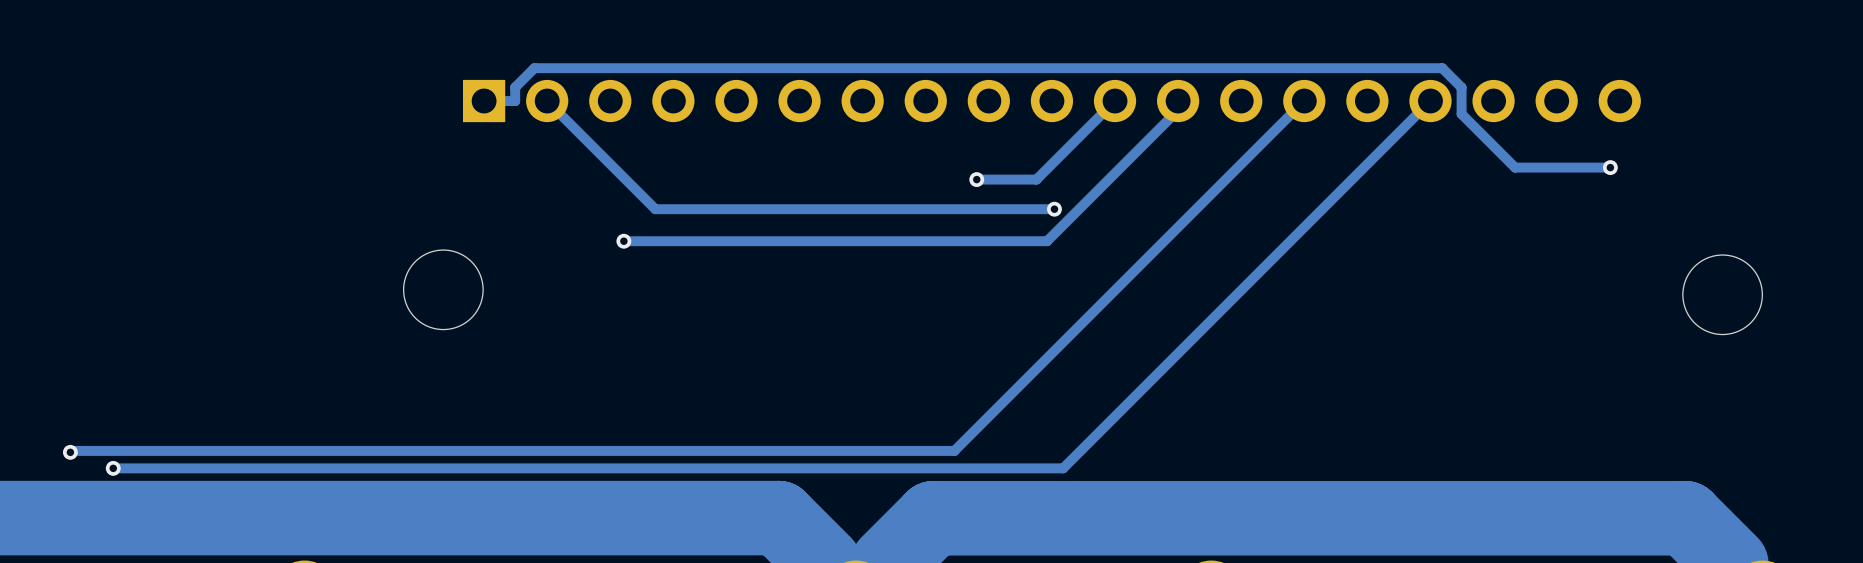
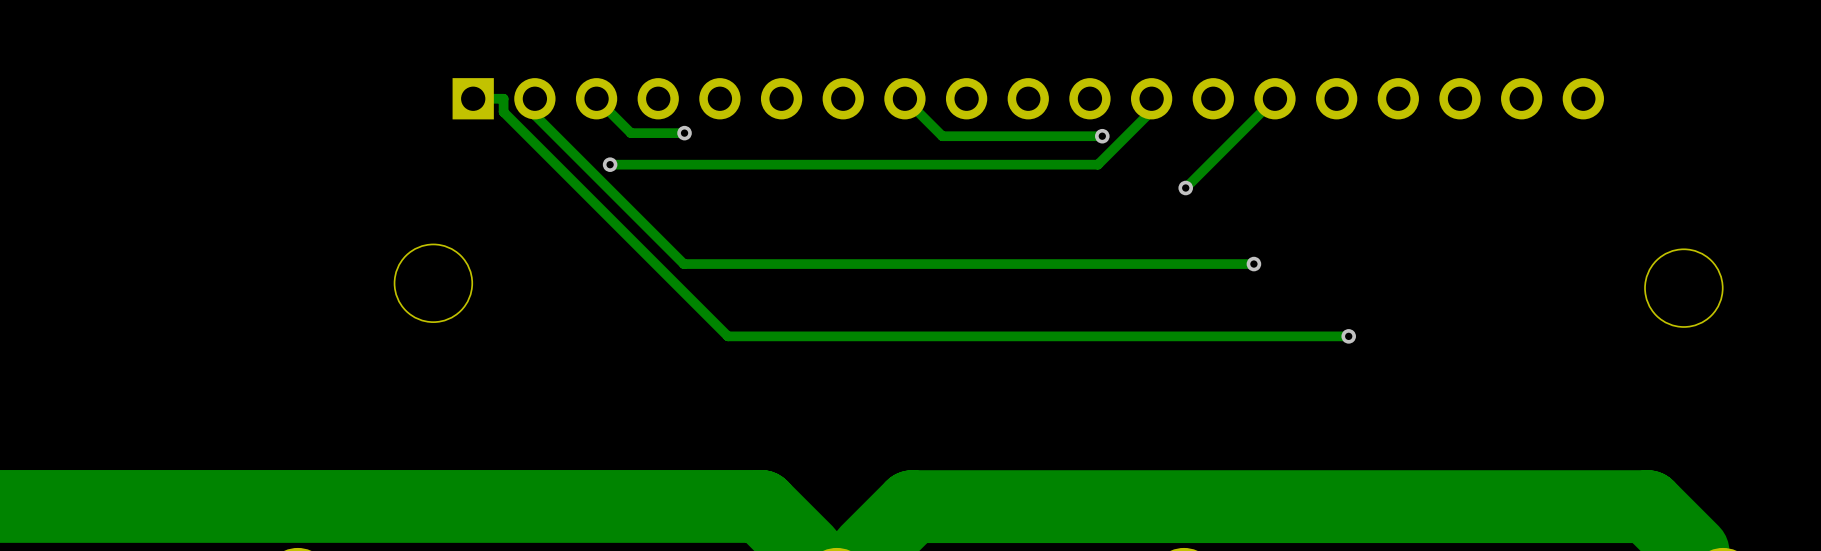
track: (515, 101) (515, 87) (534, 68) (1442, 68) (1461, 87) (1461, 114) (1515, 167) (1610, 167) -> (503, 98) (503, 112) (727, 336) (1348, 336)
track: (547, 101) (655, 209) (1054, 209) -> (534, 98) (534, 115) (683, 264) (1253, 264)
track: none -> (596, 98) (630, 133) (684, 133)
track: none -> (904, 98) (942, 136) (1102, 136)
track: (1115, 101) (1036, 179) (976, 179) -> none
track: (1430, 101) (1063, 468) (113, 468) -> none
track: (1178, 110) (1047, 241) (623, 241) -> (1151, 107) (1151, 110) (1097, 164) (610, 164)
via: none -> (684, 133)
via: none -> (1102, 136)
via: (1610, 167) -> none
via: none -> (610, 164)
via: (976, 179) -> none
track: (1213, 192) (954, 450) (70, 452) -> none
via: none -> (1185, 188)
via: (1054, 209) -> none
via: (623, 241) -> none
via: none -> (1253, 264)
via: none -> (1348, 336)
via: (70, 452) -> none
via: (113, 468) -> none

